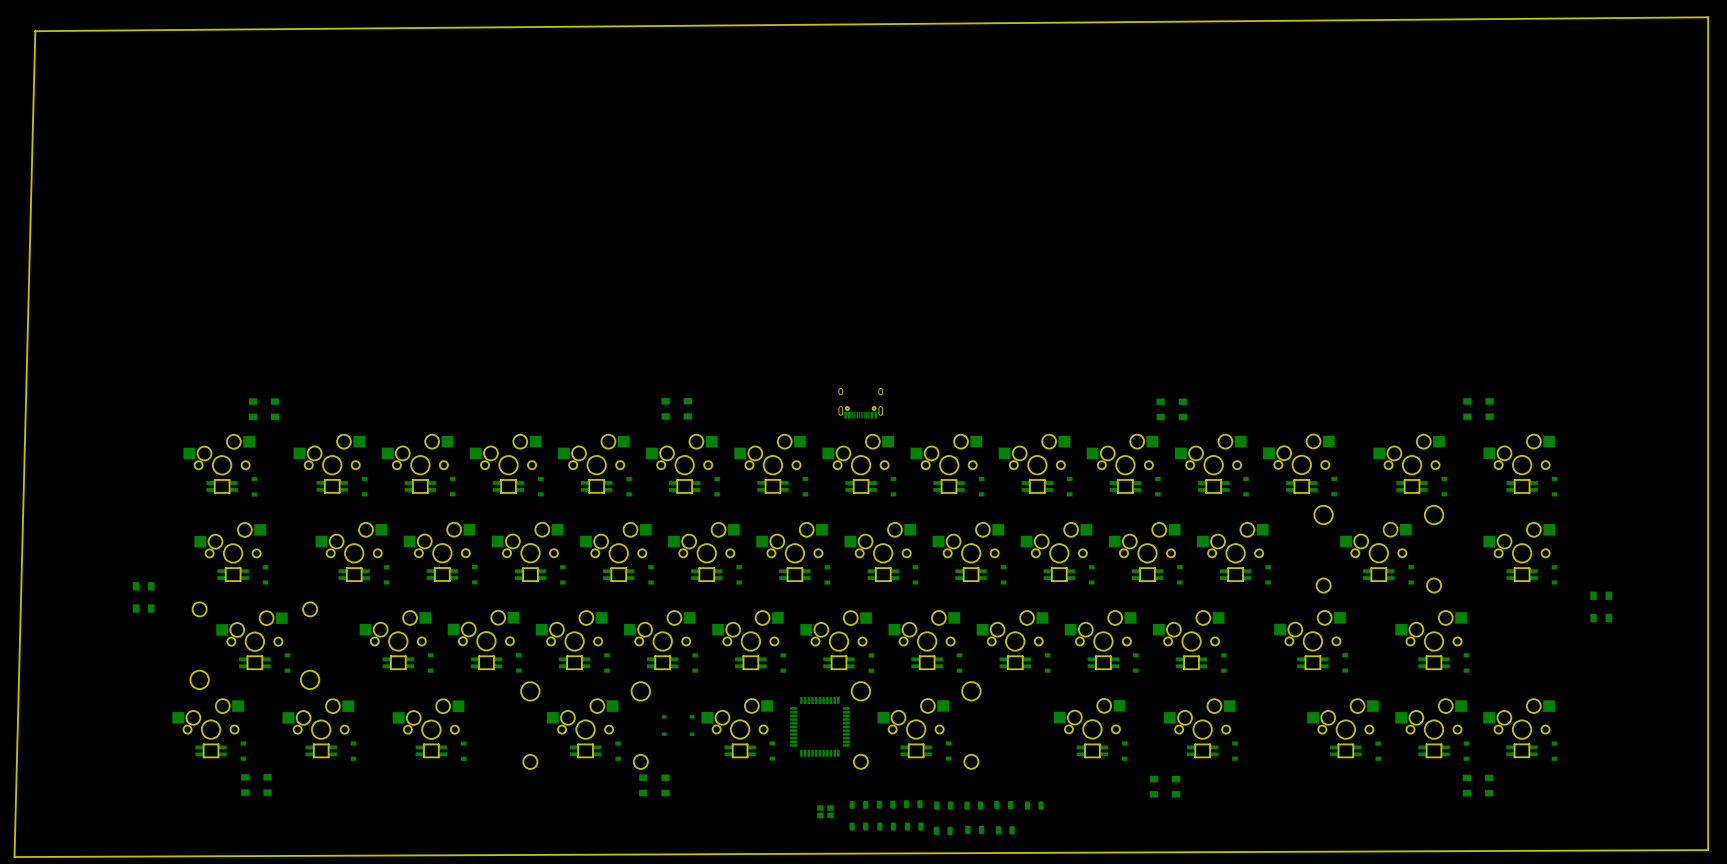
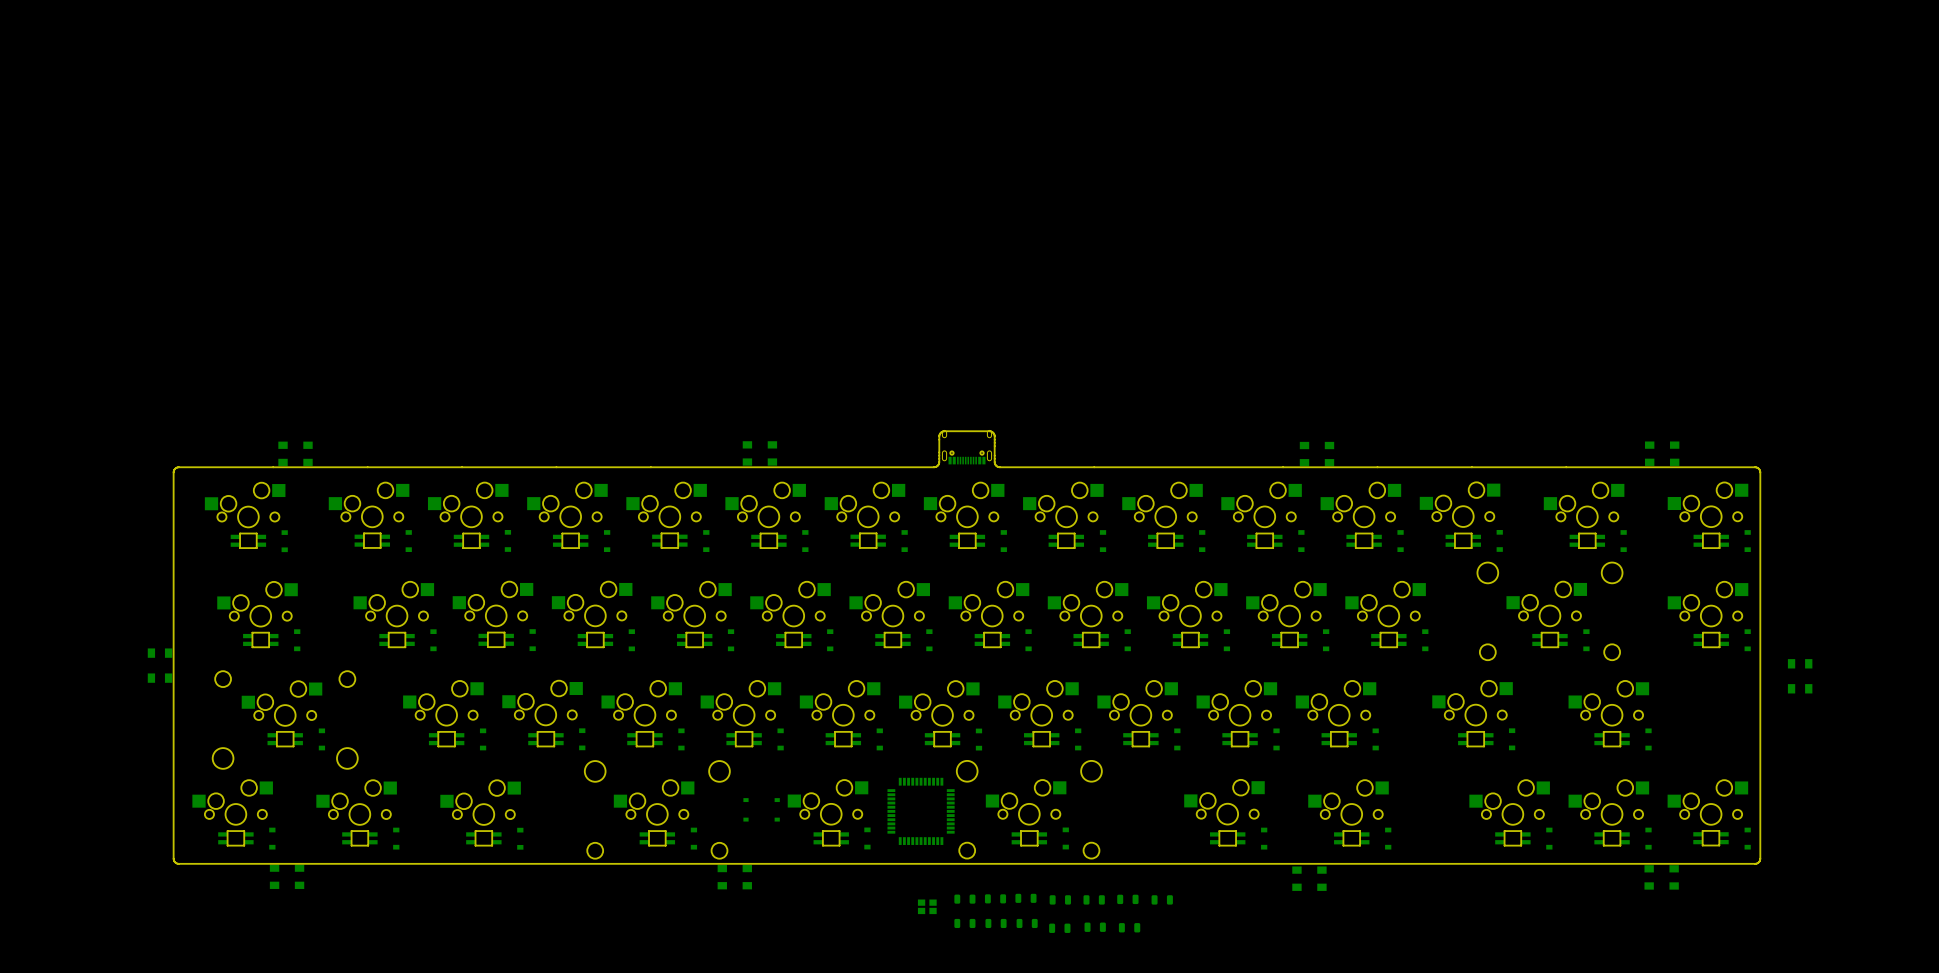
board edge: (1708, 17) (35, 31) (14, 857) (1708, 850) (1708, 17) -> none
board edge: none -> (944, 431) (939, 435) (939, 463) (934, 467) (175, 468) (173, 472) (174, 861) (178, 863) (1755, 863) (1759, 860) (1760, 472) (1757, 467) (999, 467) (994, 463) (994, 436) (992, 432) (944, 431)

